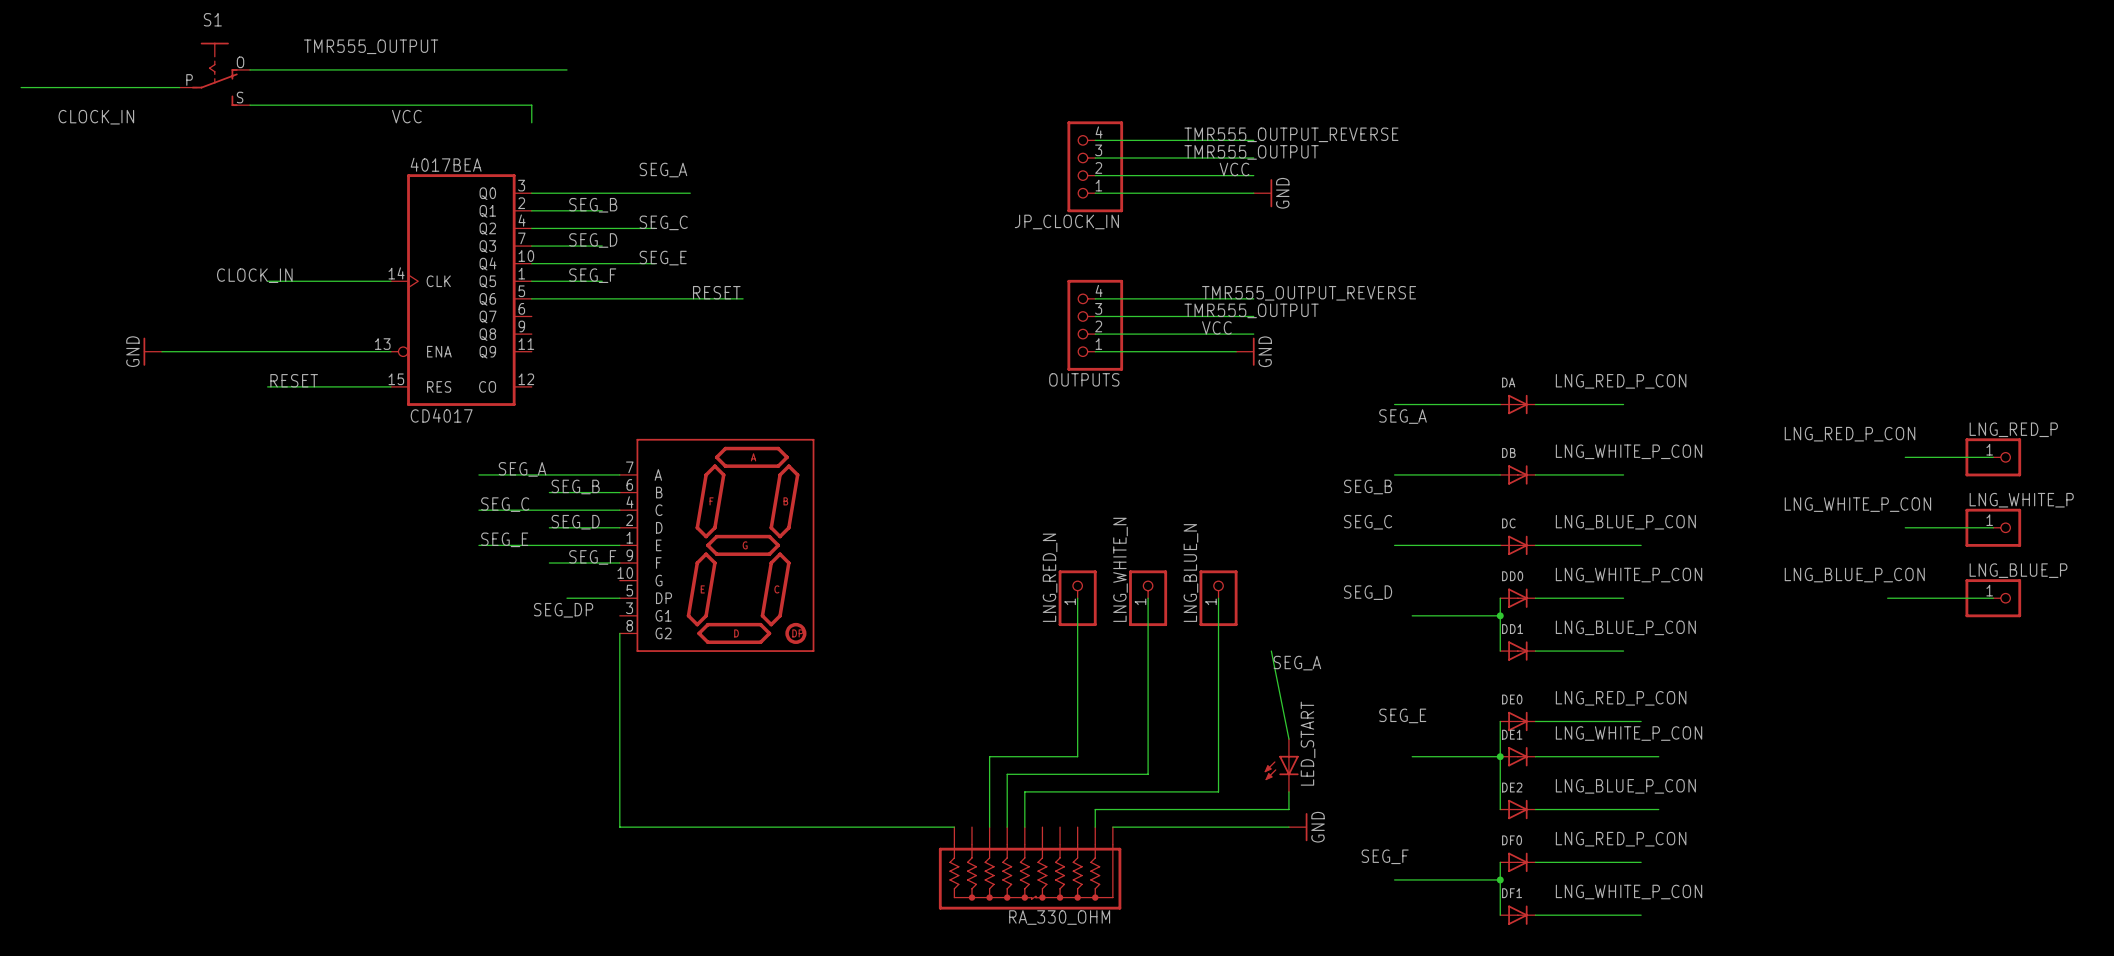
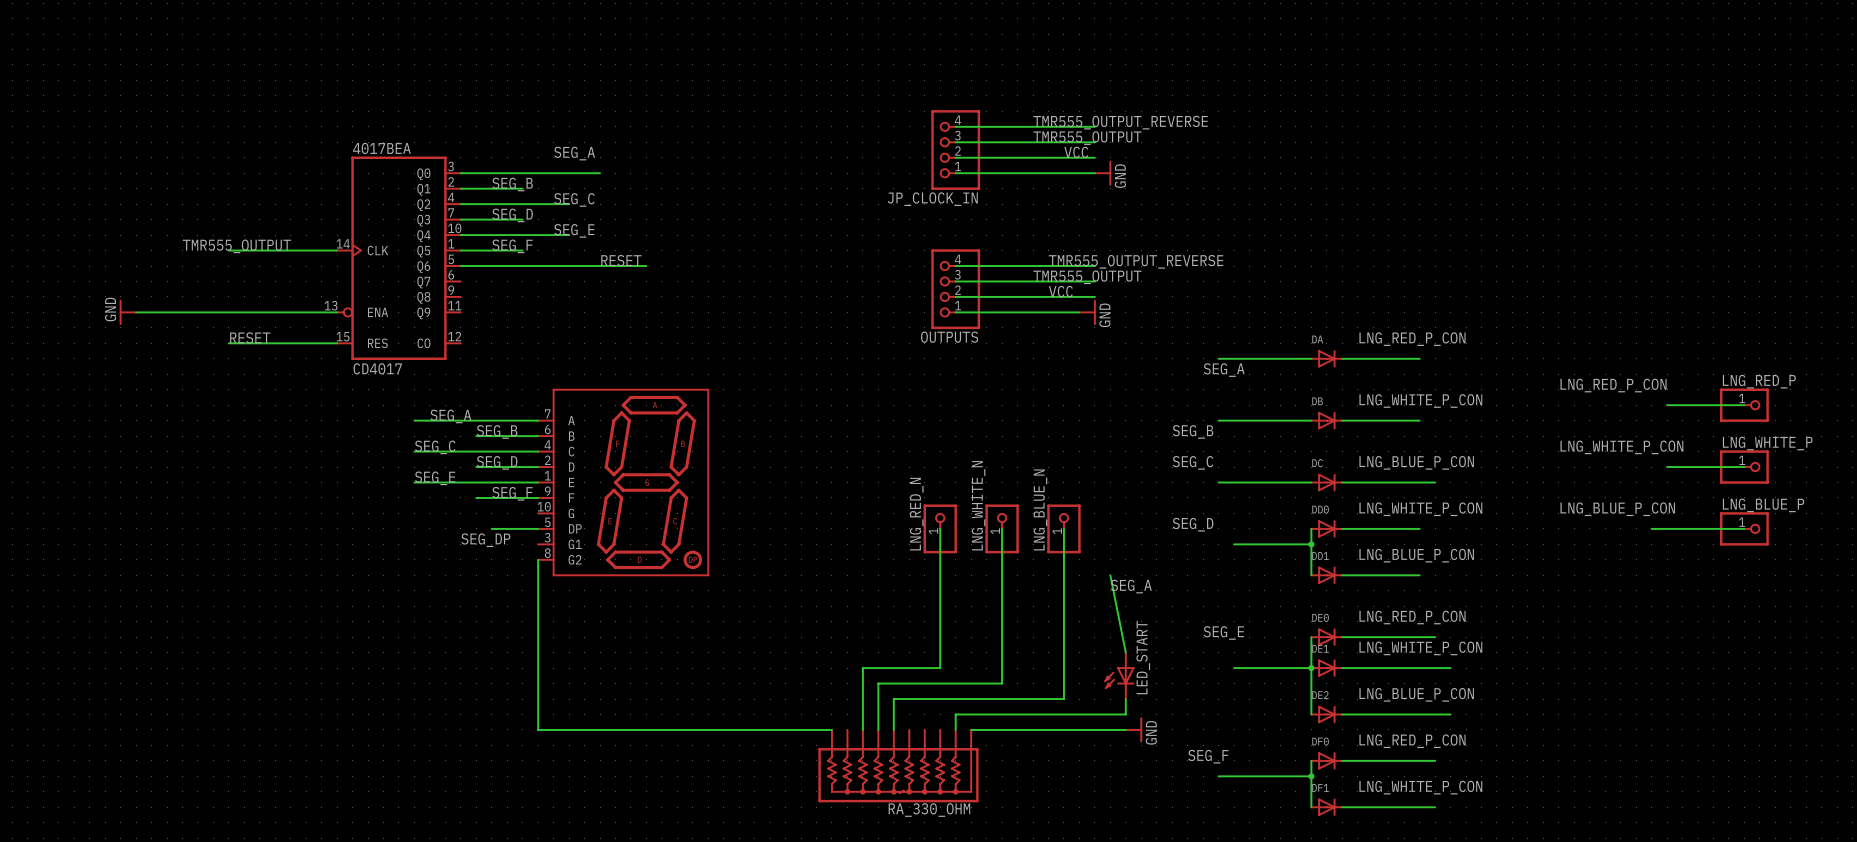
label: TMR555_OUTPUT (371, 46) -> none
wire: (250, 69) (566, 69) -> none
S1: (214, 74) -> none
wire: (21, 87) (179, 87) -> none
wire: (250, 105) (531, 105) (531, 122) -> none
label: VCC (406, 116) -> none
label: CLOCK_IN (96, 117) -> none
label: CLOCK_IN (254, 275) -> TMR555_OUTPUT (236, 246)

